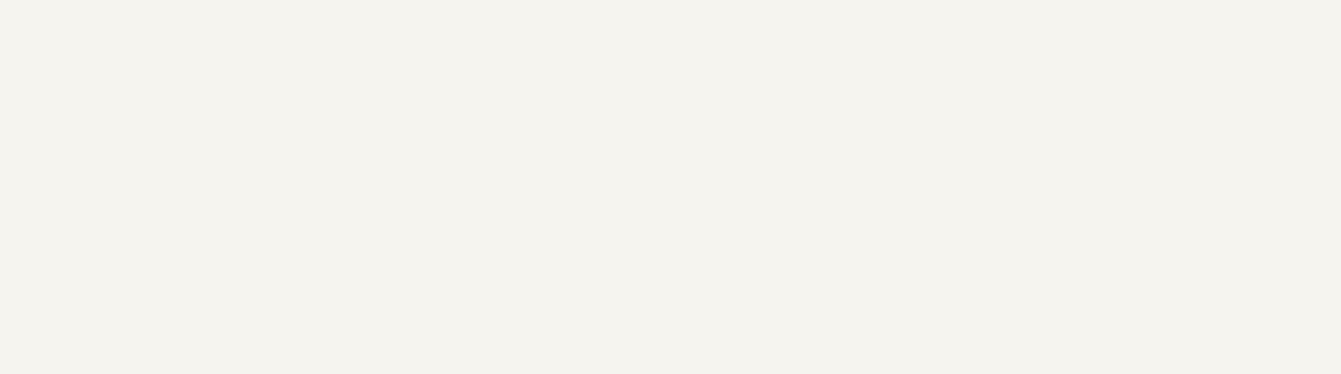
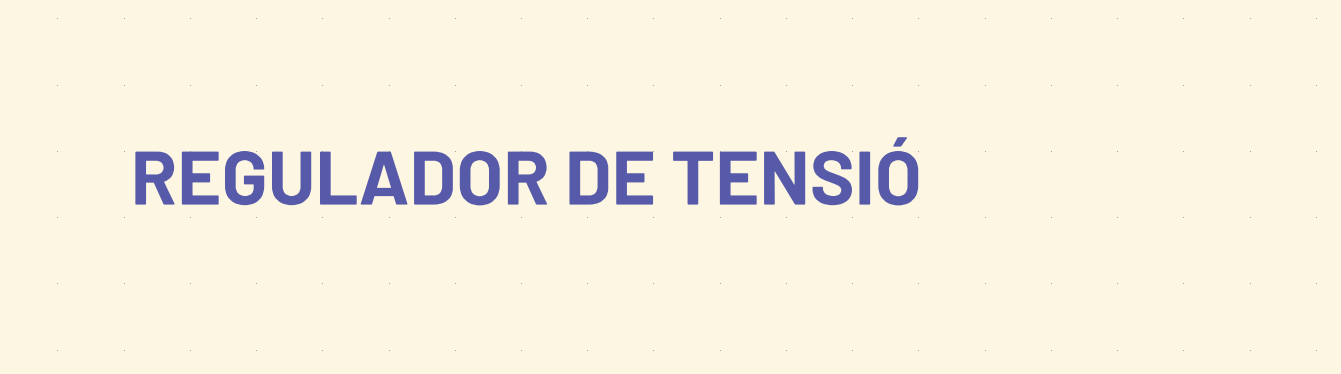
text: none -> REGULADOR DE TENSIÓ (526, 171)

